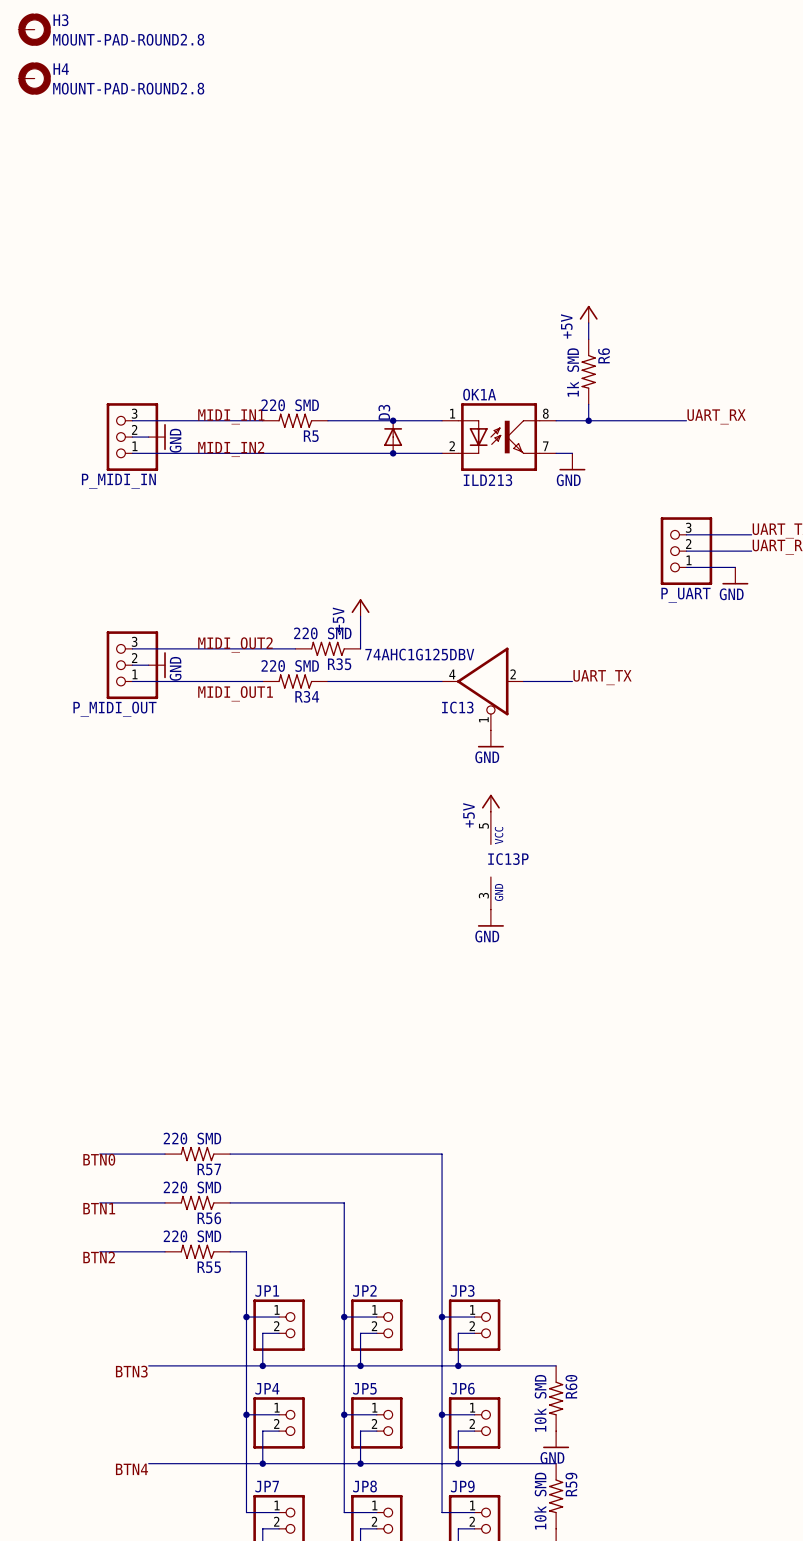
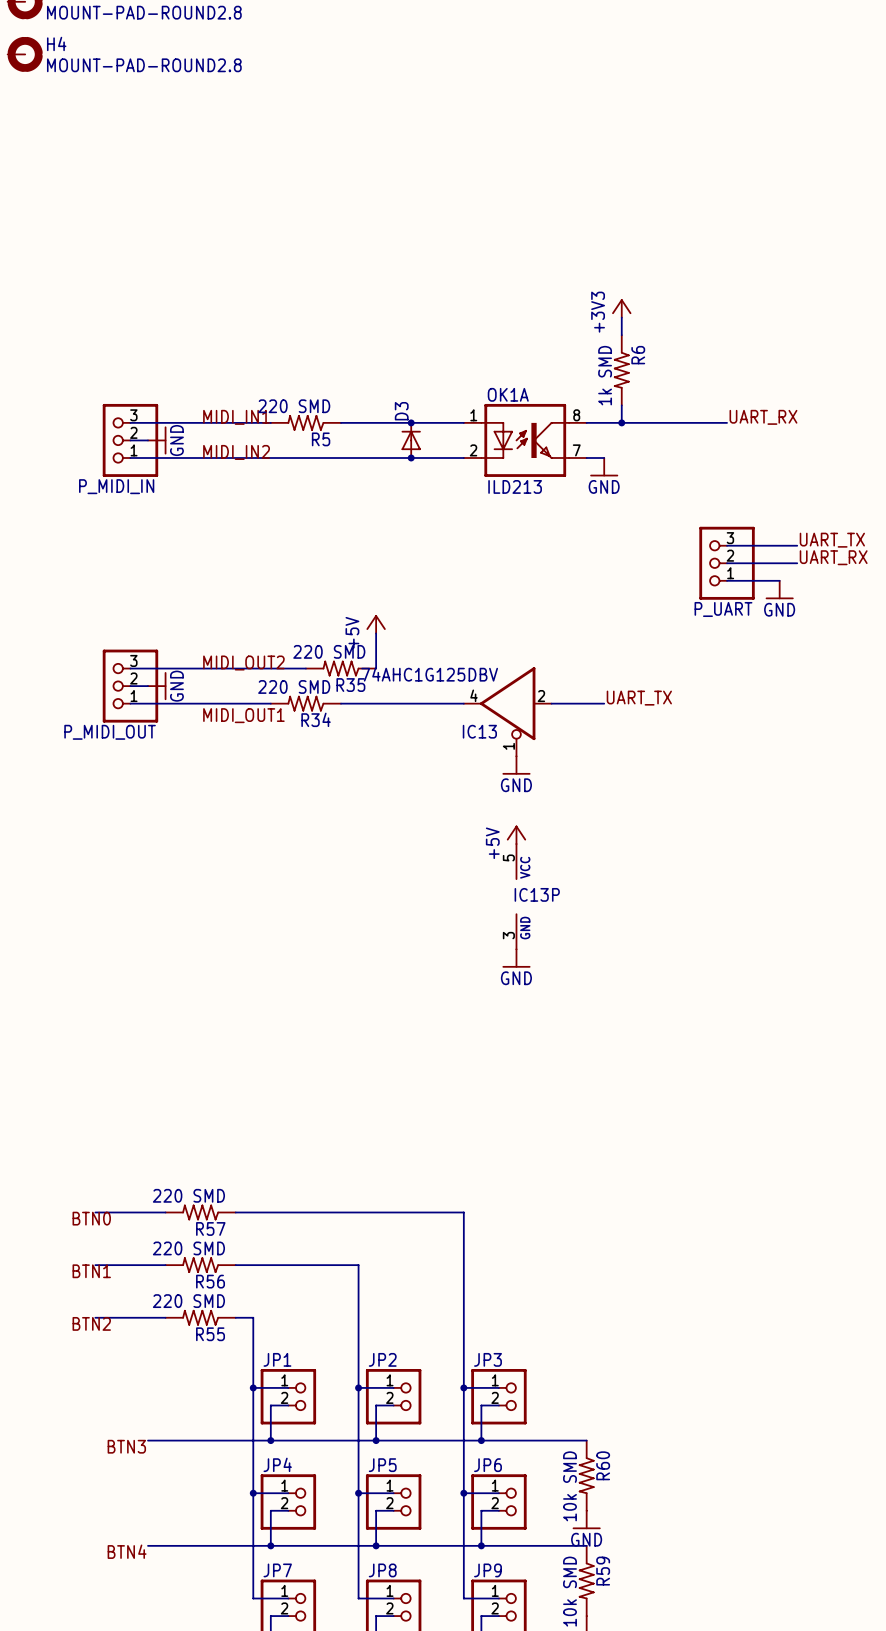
power symbol: +5V (588, 314) -> +3V3 (621, 308)

